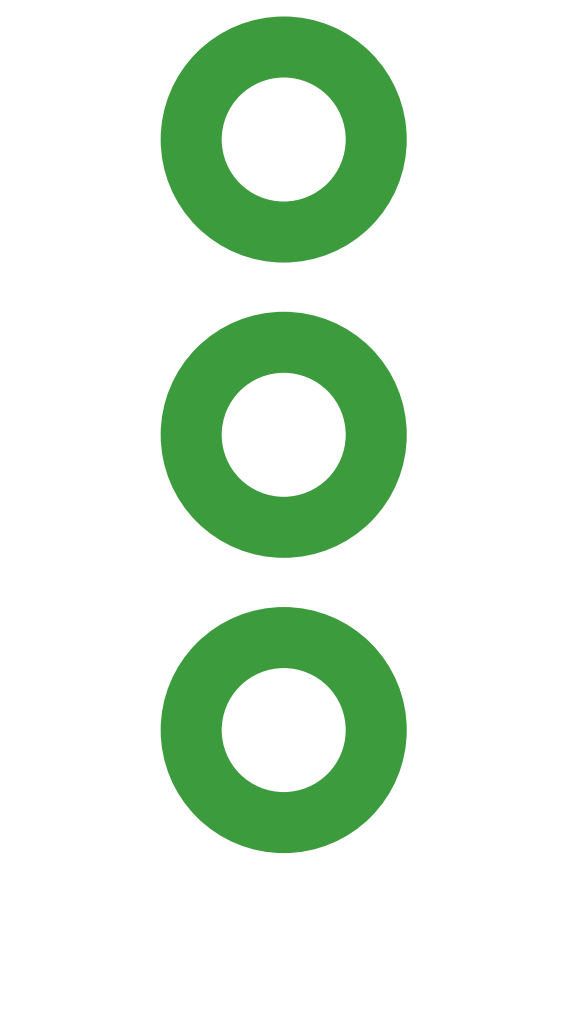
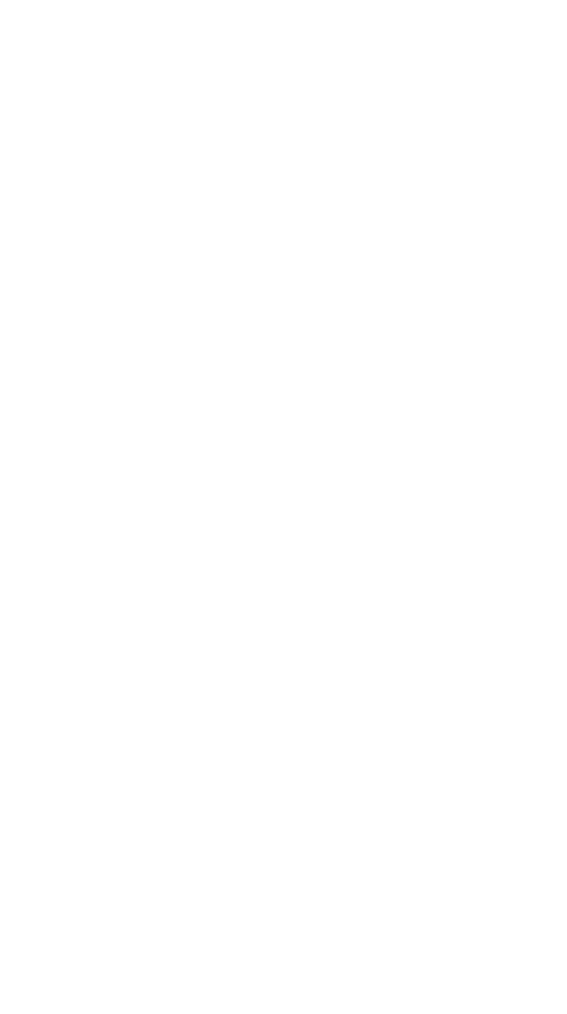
part: (283, 139) -> none
part: (283, 434) -> none
part: (283, 730) -> none

